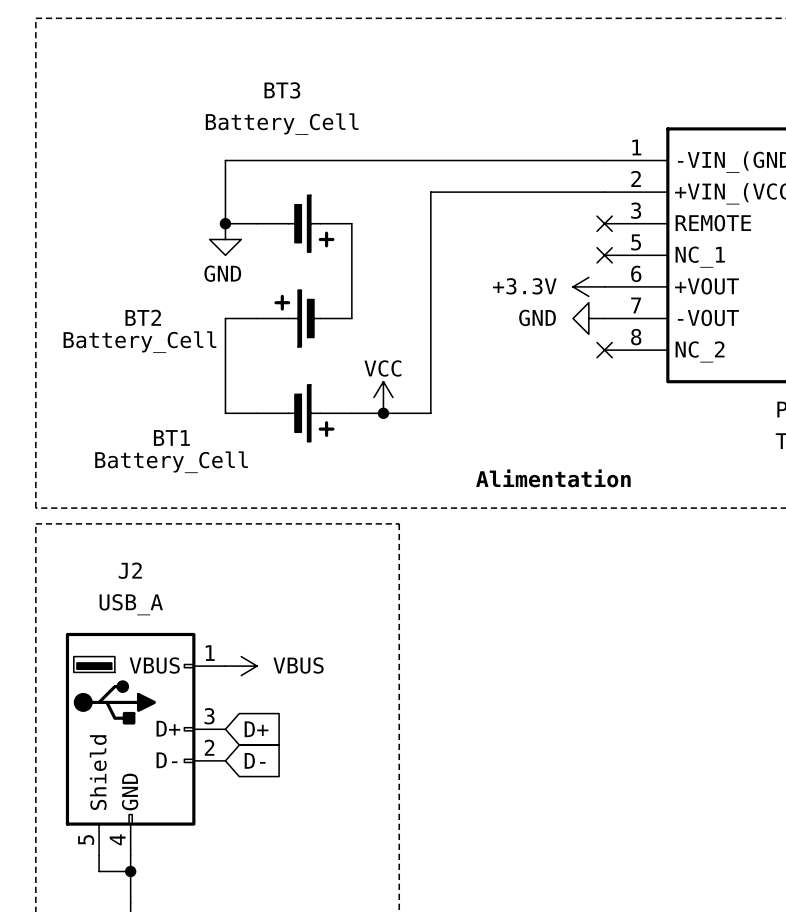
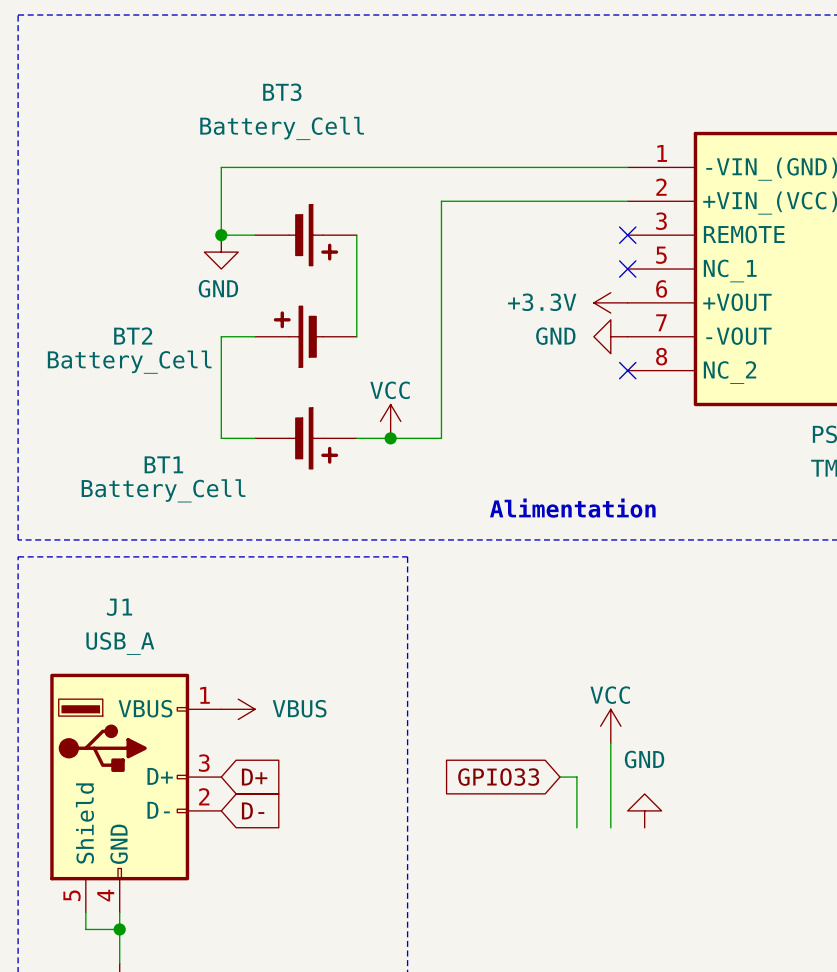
J2 name: J2 (130, 570) -> J1 (119, 607)
power symbol: none -> VCC (610, 726)
wire: none -> (610, 743) (610, 827)
global label: none -> GPIO33 (498, 777)
wire: none -> (559, 777) (576, 777) (576, 827)
power symbol: none -> GND (644, 810)

